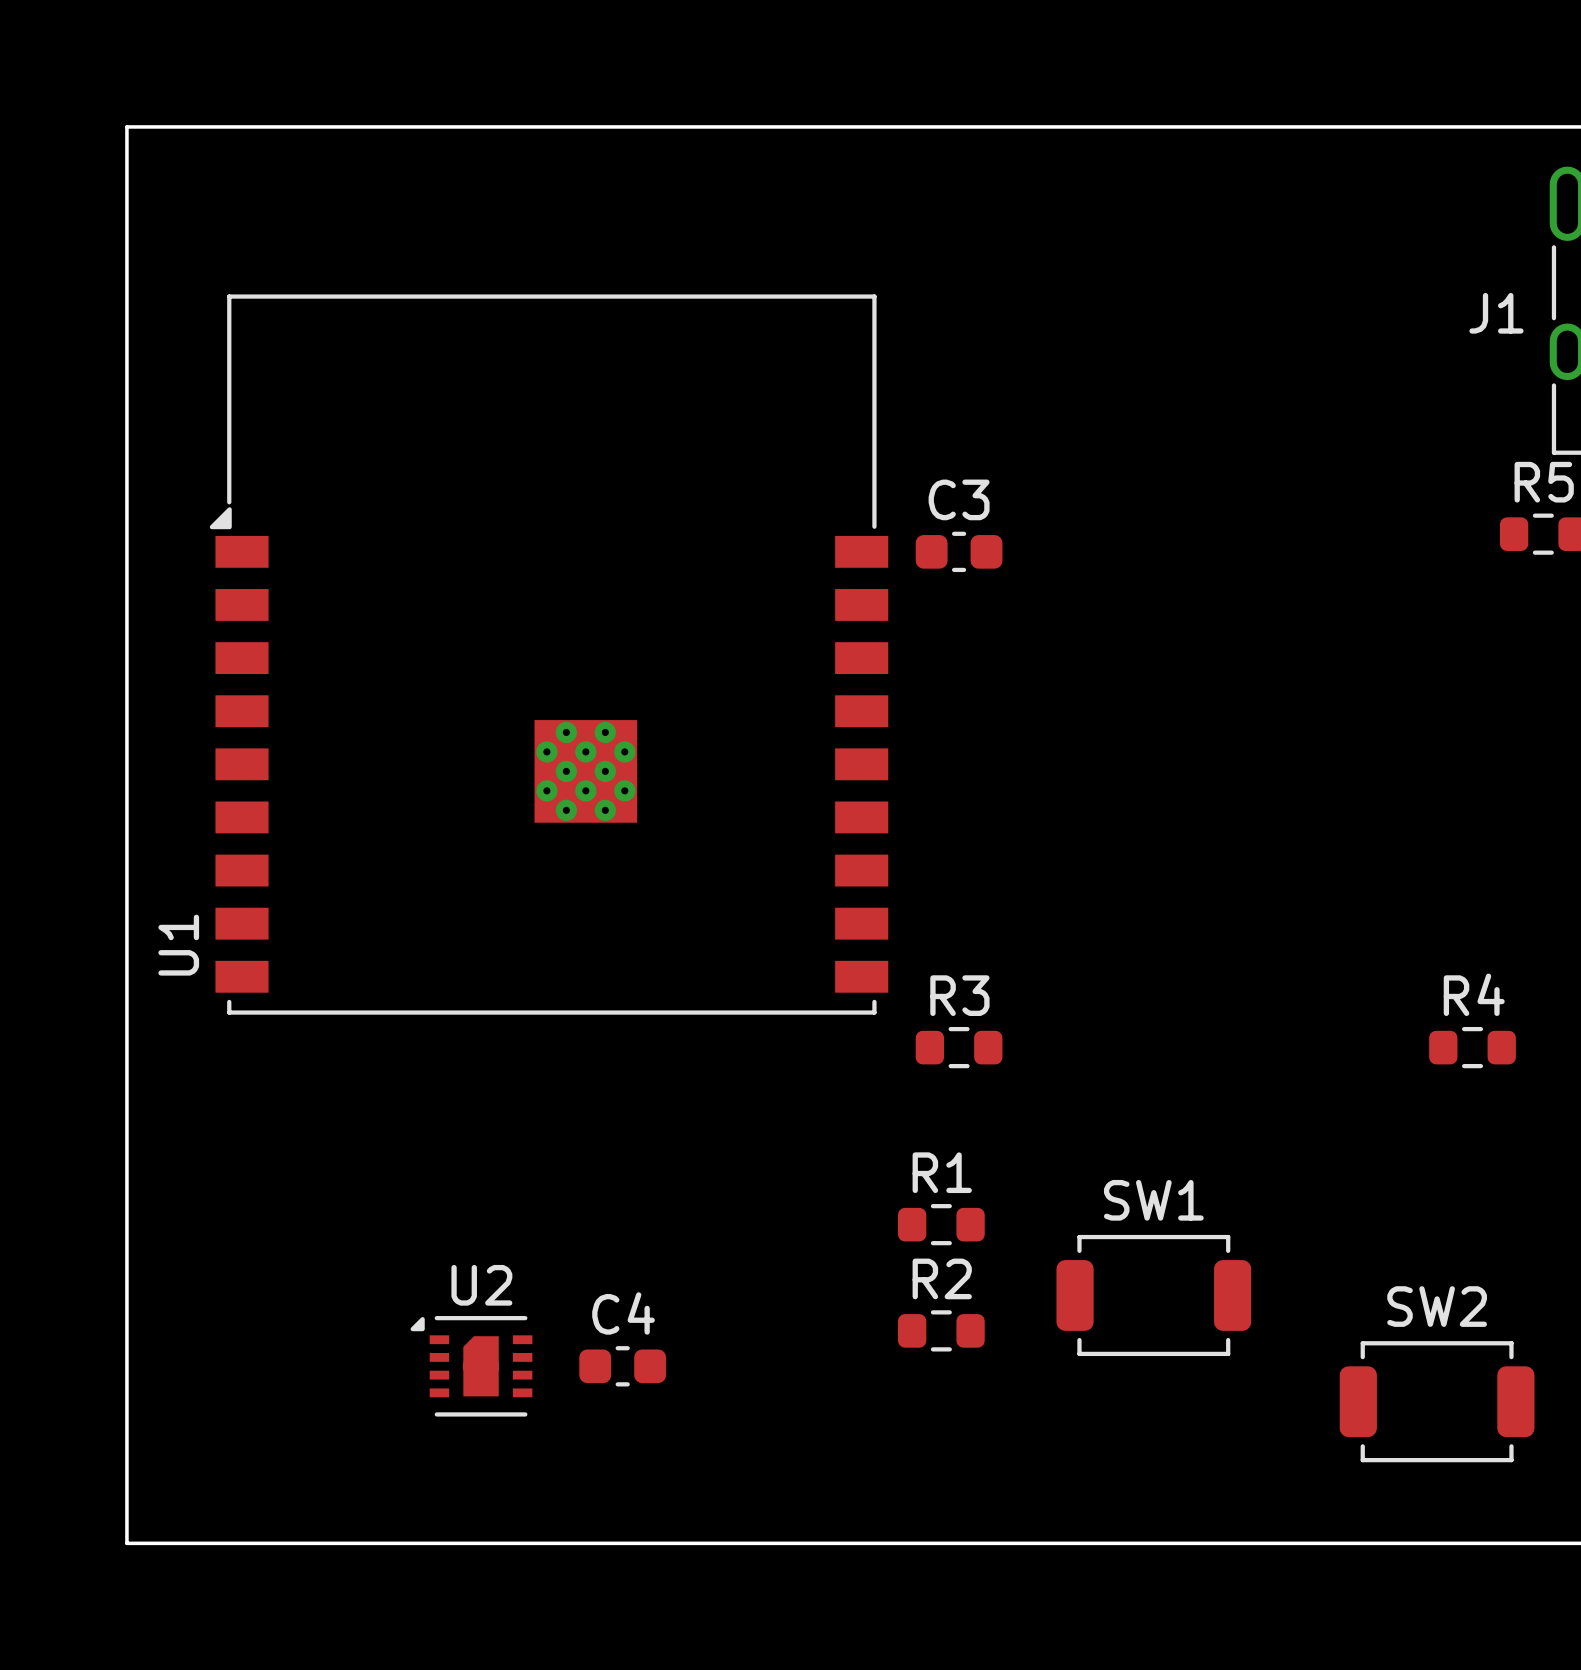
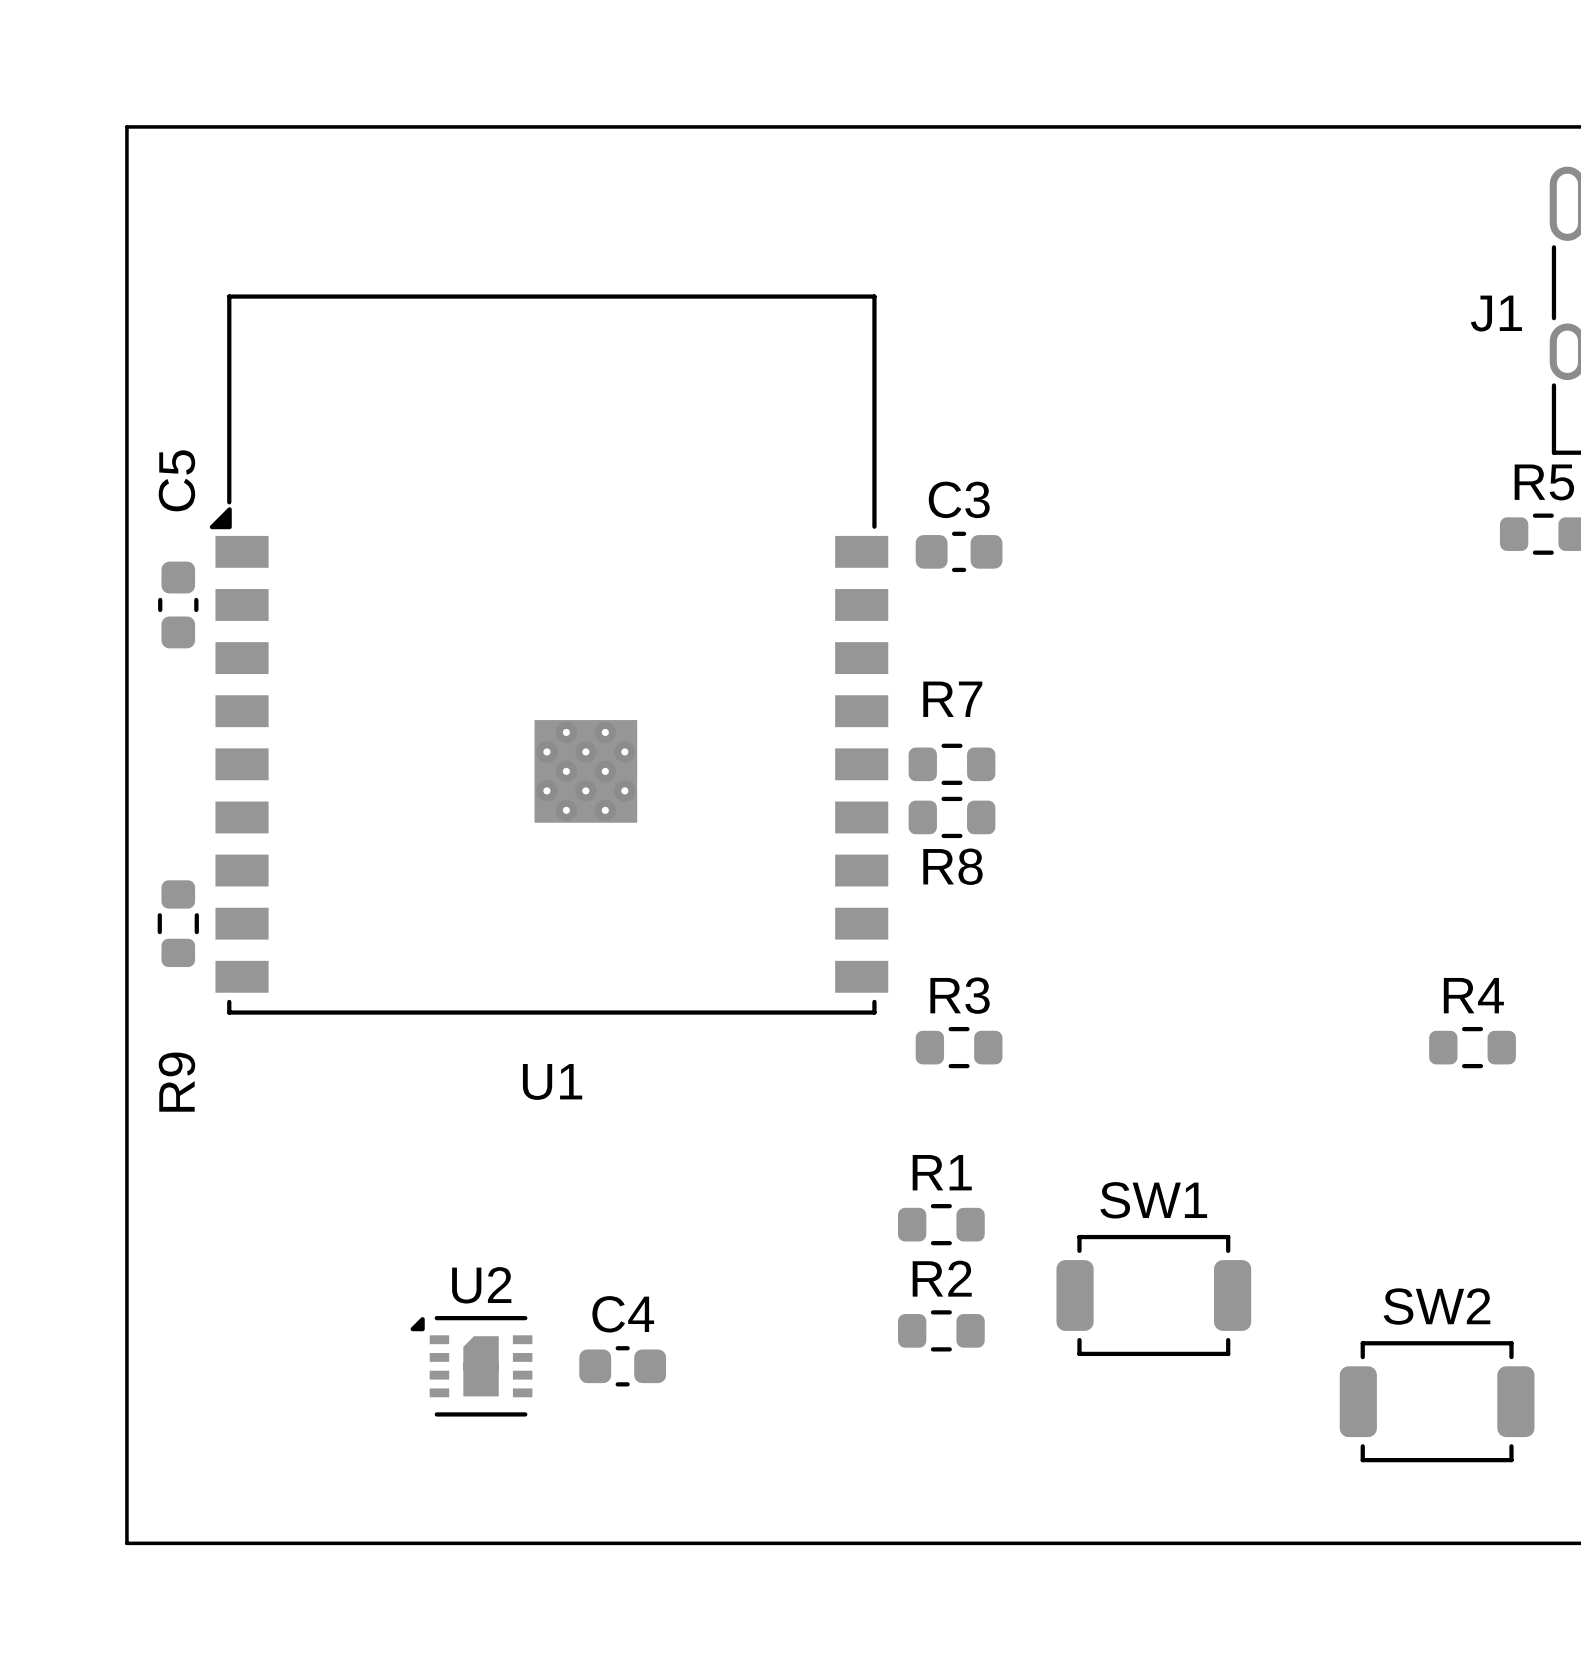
C5: none -> (178, 604)
R7: none -> (951, 764)
R8: none -> (951, 817)
R9: none -> (178, 923)
U1 name rotation: 0° (178, 945) -> 90° clockwise (552, 1081)
U1 name position: U1 (178, 945) -> U1 (552, 1081)

